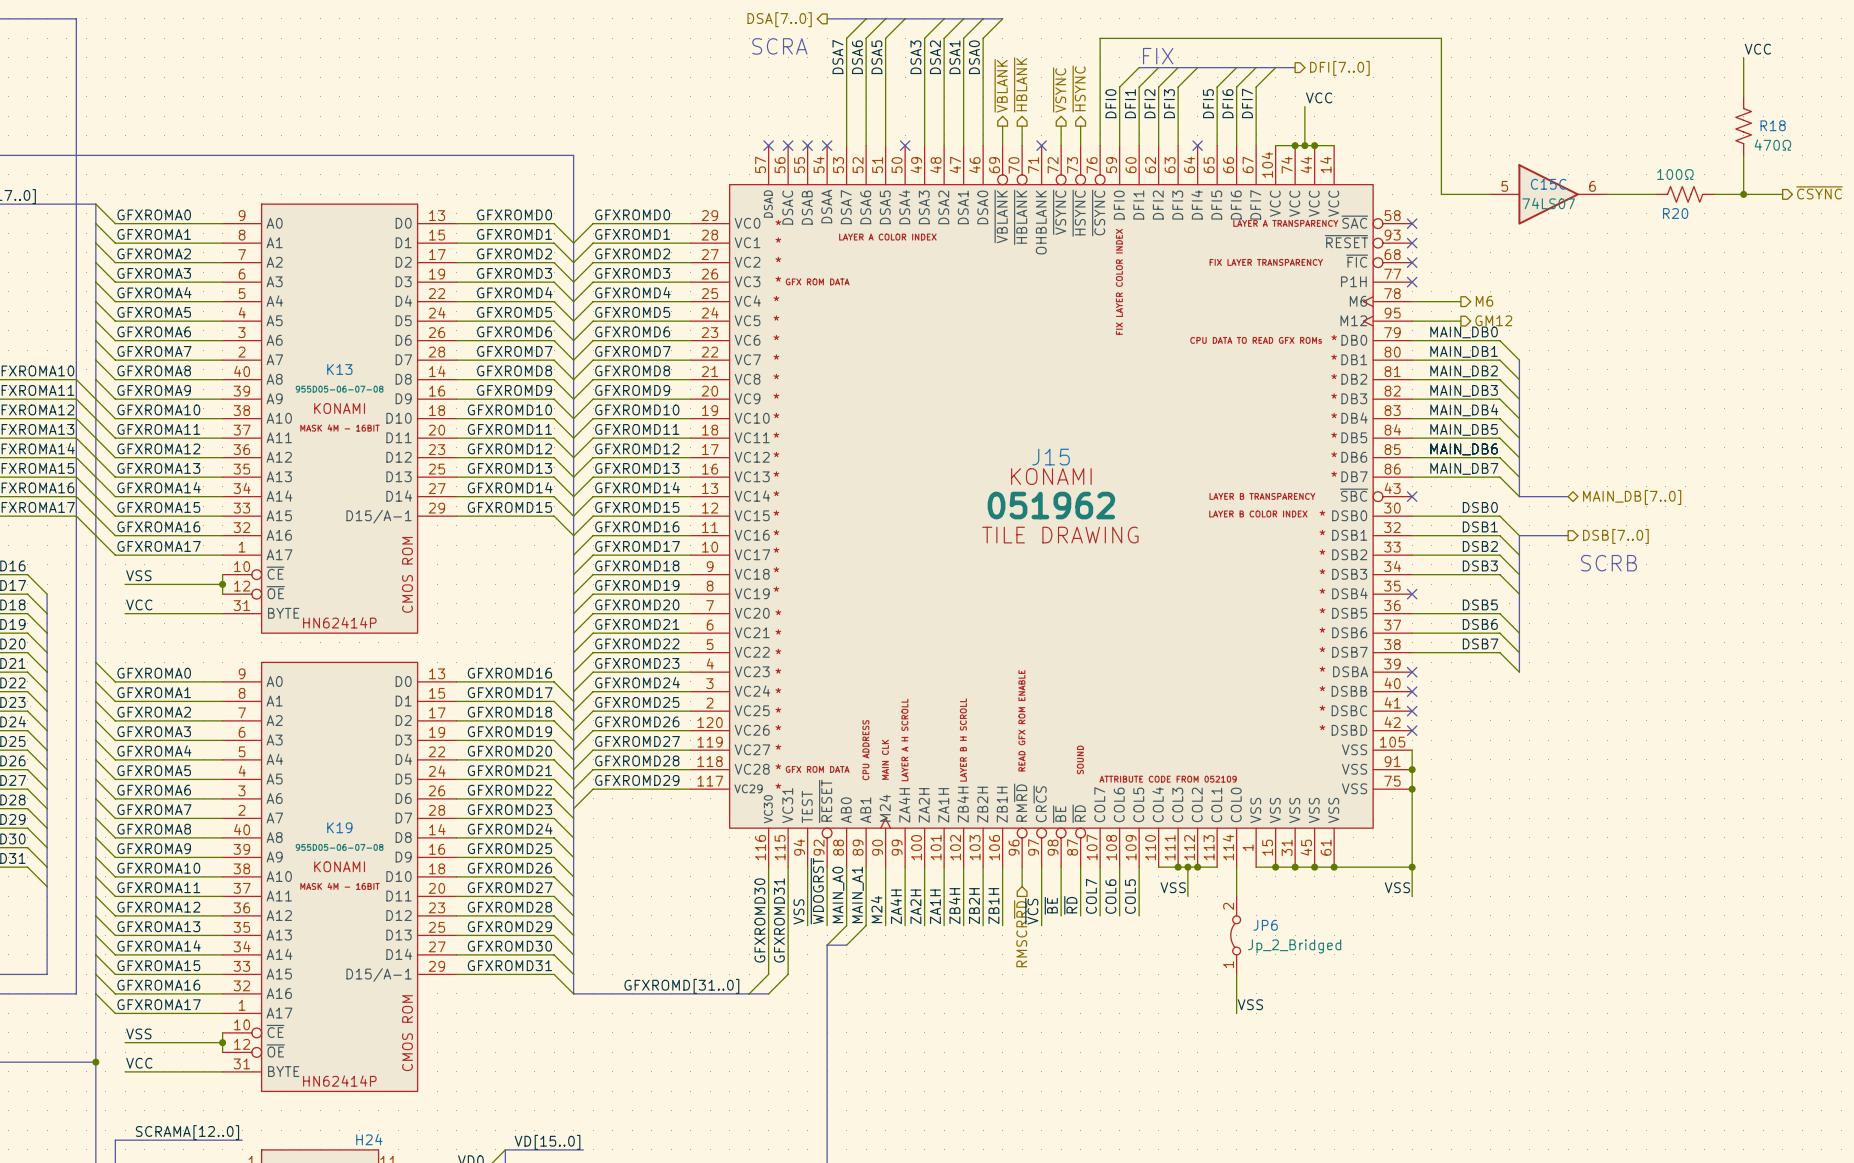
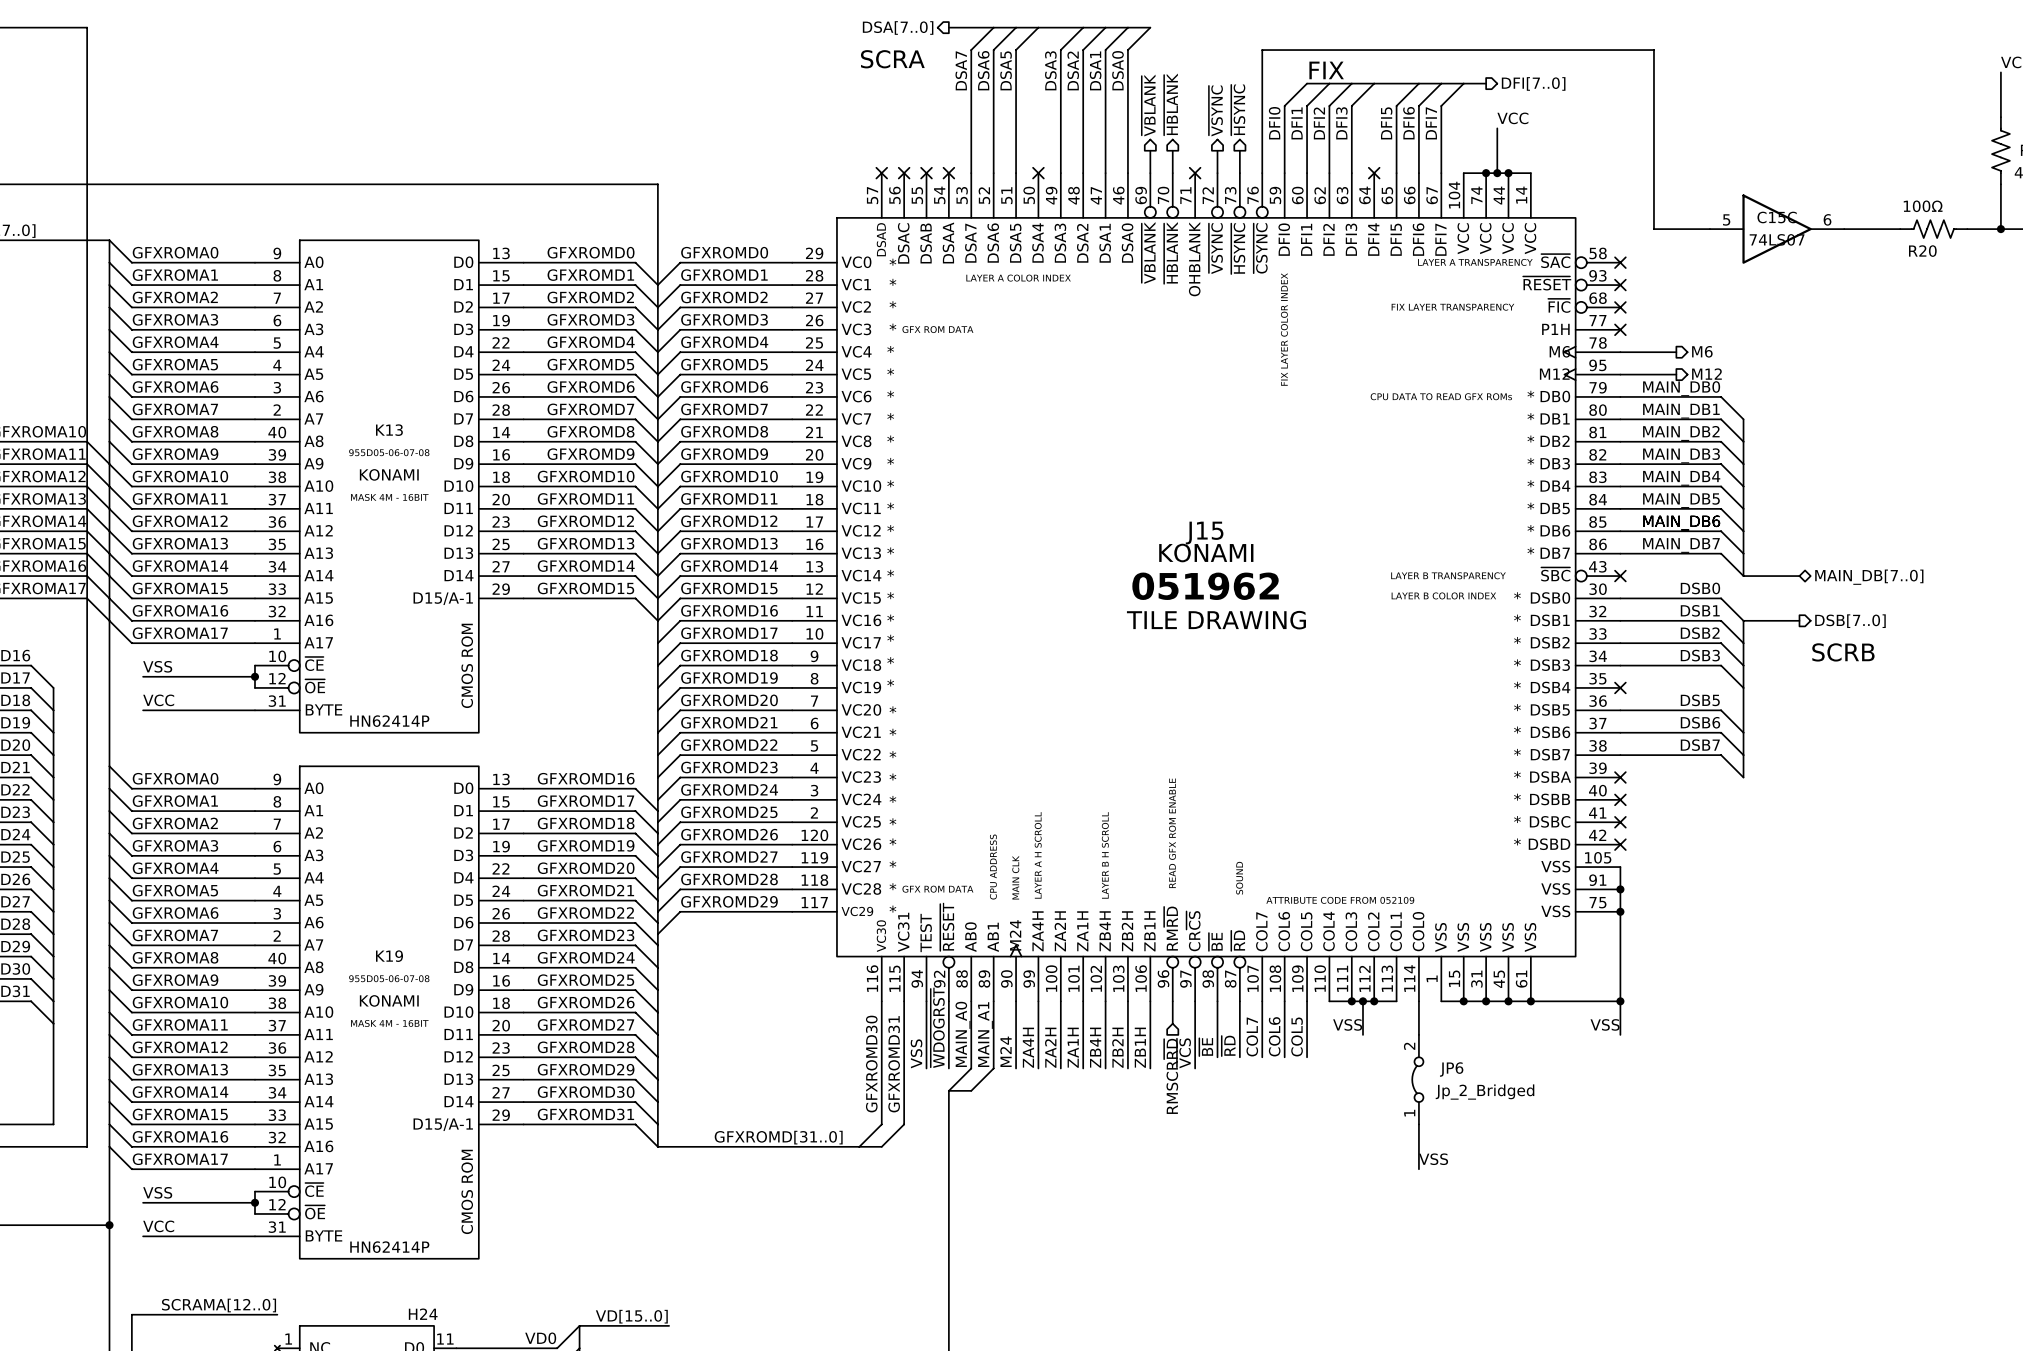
hierarchical label: GM12 (1493, 320) -> M12 (1706, 374)

